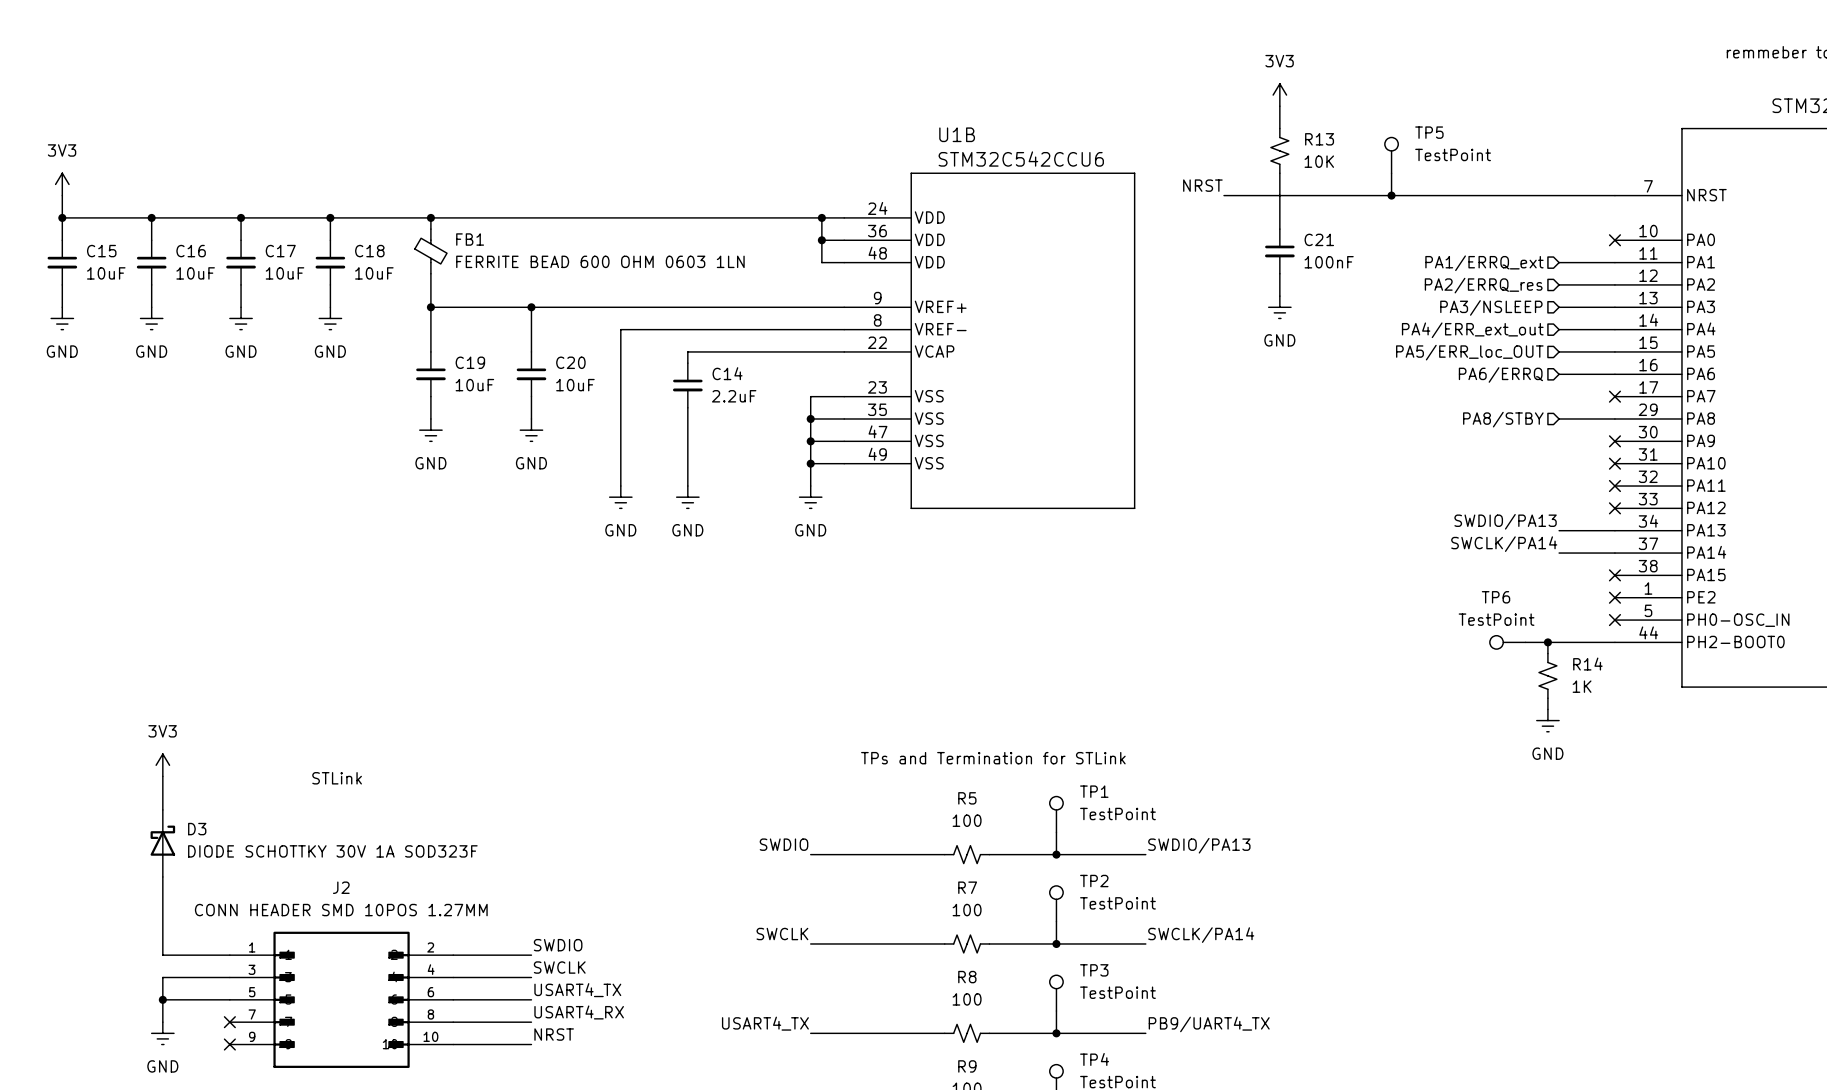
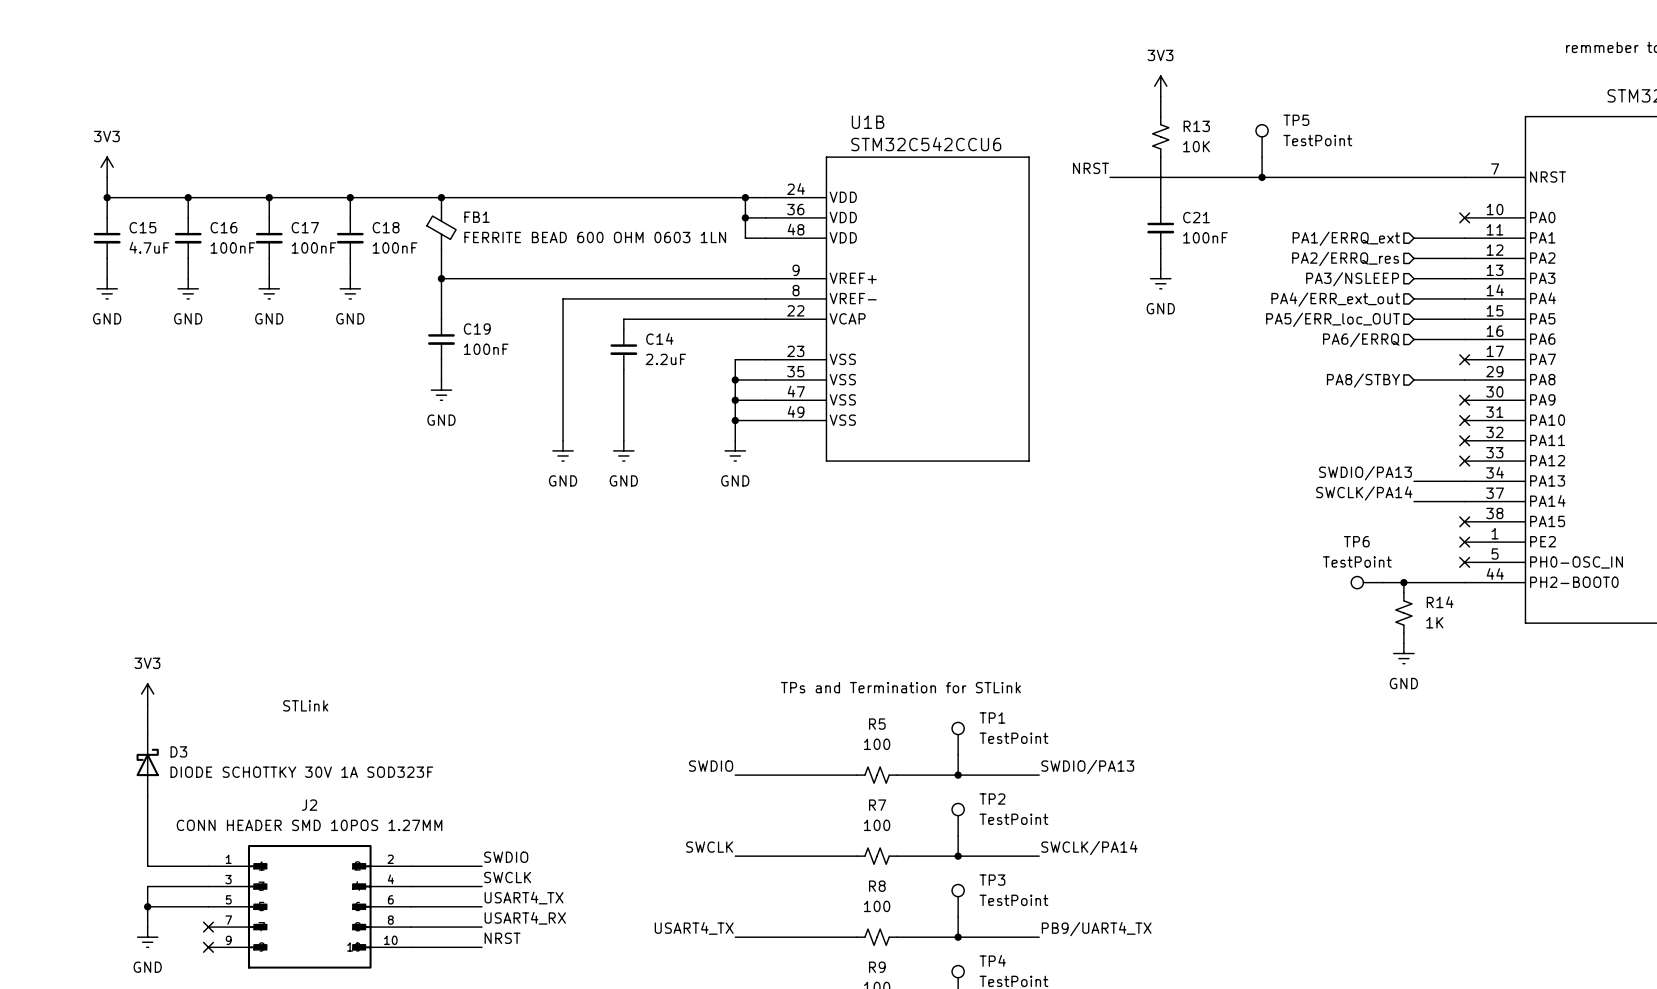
power symbol position: 3V3 (62, 184) -> 3V3 (107, 167)
wire: (62, 195) (62, 240) -> (107, 177) (107, 217)
wire: (62, 217) (118, 217) -> none
junction: (62, 217) -> none
junction: none -> (107, 197)
wire: (151, 217) (151, 240) -> (188, 197) (188, 217)
junction: (151, 217) -> none
junction: none -> (188, 197)
wire: (241, 217) (241, 240) -> (269, 197) (269, 217)
junction: (241, 217) -> none
junction: none -> (269, 197)
wire: (330, 217) (330, 240) -> (350, 197) (350, 217)
junction: (330, 217) -> none
junction: none -> (350, 197)
wire: (430, 217) (430, 229) -> (441, 197) (441, 207)
junction: (430, 217) -> none
junction: none -> (441, 197)
FB1 position: (430, 251) -> (441, 228)
C15 position: (62, 262) -> (107, 238)
C16 position: (151, 262) -> (188, 238)
C17 position: (241, 262) -> (269, 238)
C18 position: (330, 262) -> (350, 238)
C15 value: 10uF (106, 273) -> 4.7uF (149, 247)
C16 value: 10uF (195, 273) -> 100nF (232, 247)
C17 value: 10uF (285, 273) -> 100nF (313, 247)
C18 value: 10uF (374, 273) -> 100nF (395, 247)
wire: (430, 273) (430, 351) -> (441, 248) (441, 319)
wire: (62, 284) (62, 307) -> (107, 258) (107, 278)
wire: (151, 284) (151, 307) -> (188, 258) (188, 278)
wire: (241, 284) (241, 307) -> (269, 258) (269, 278)
wire: (330, 284) (330, 307) -> (350, 258) (350, 278)
wire: (430, 307) (486, 307) -> none
junction: (430, 307) -> none
junction: none -> (441, 278)
wire: (531, 307) (531, 351) -> none
junction: (531, 307) -> none
power symbol: GND (62, 318) -> none
power symbol: none -> GND (107, 288)
power symbol: GND (151, 318) -> none
power symbol: none -> GND (188, 288)
power symbol: GND (241, 318) -> none
power symbol: none -> GND (269, 288)
power symbol: GND (330, 318) -> none
power symbol: none -> GND (350, 288)
C19 position: (430, 374) -> (441, 339)
C20: 10uF (531, 374) -> none
C19 value: 10uF (474, 385) -> 100nF (486, 349)
wire: (430, 396) (430, 418) -> (441, 359) (441, 380)
wire: (531, 396) (531, 418) -> none
power symbol: GND (430, 430) -> none
power symbol: none -> GND (441, 390)
power symbol: GND (531, 430) -> none

